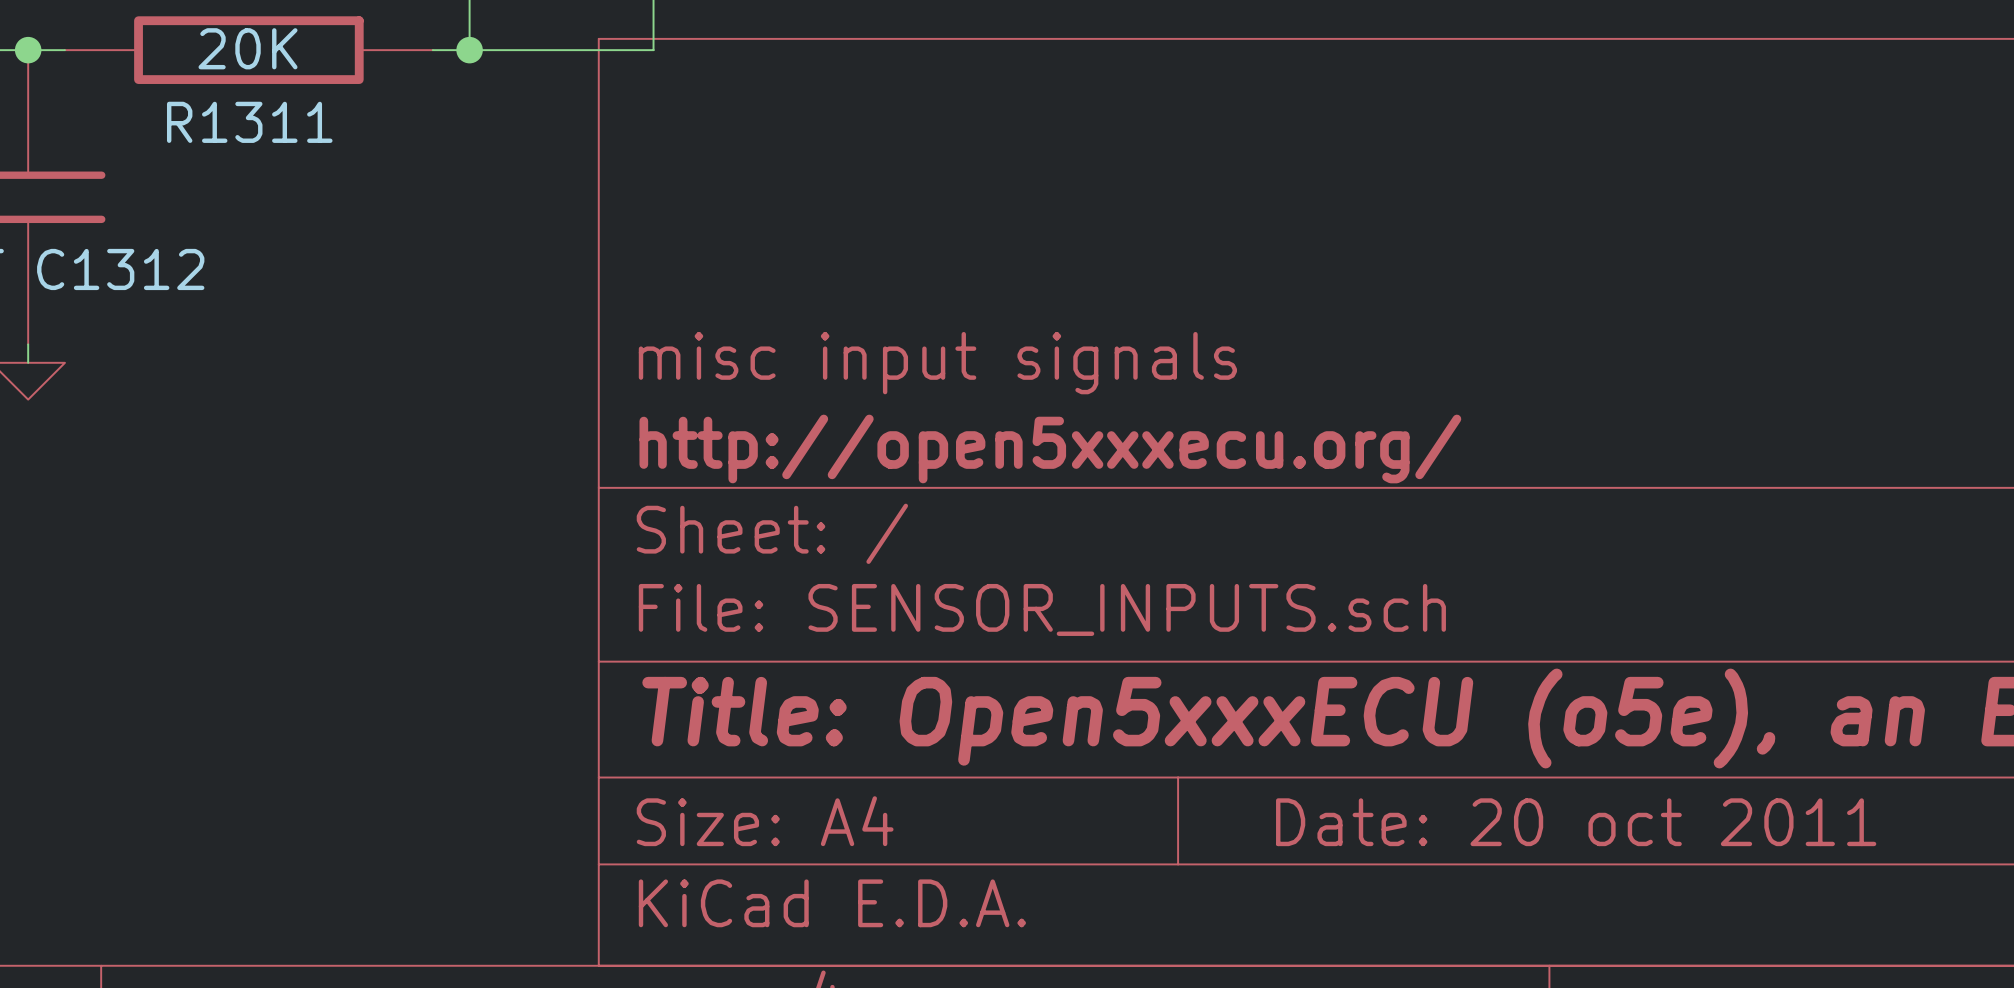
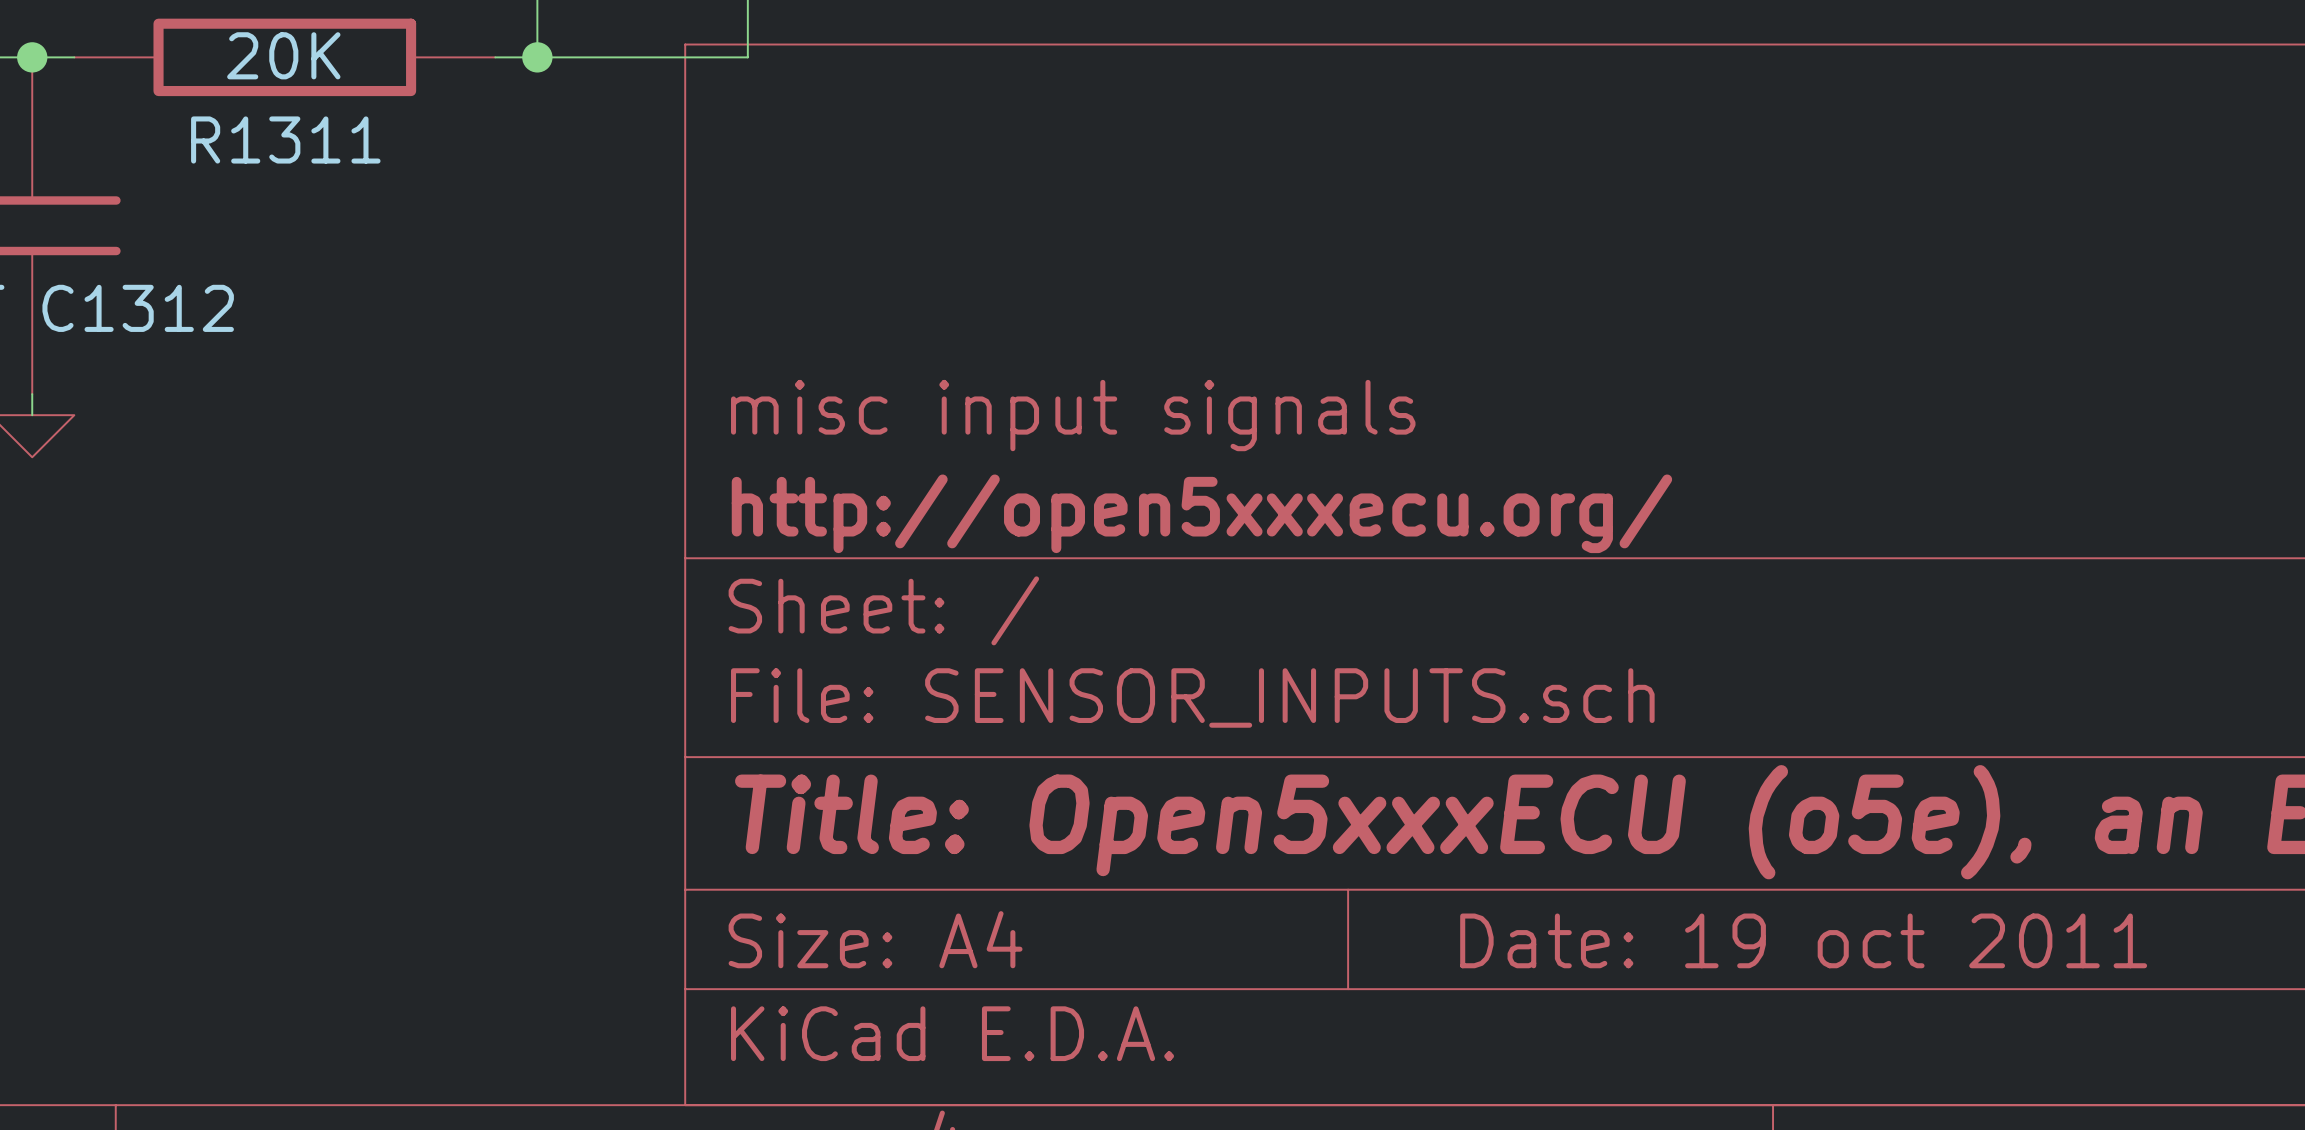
title block: Date: 20 oct 2011 (1576, 822) -> Date: 19 oct 2011 (1803, 940)

